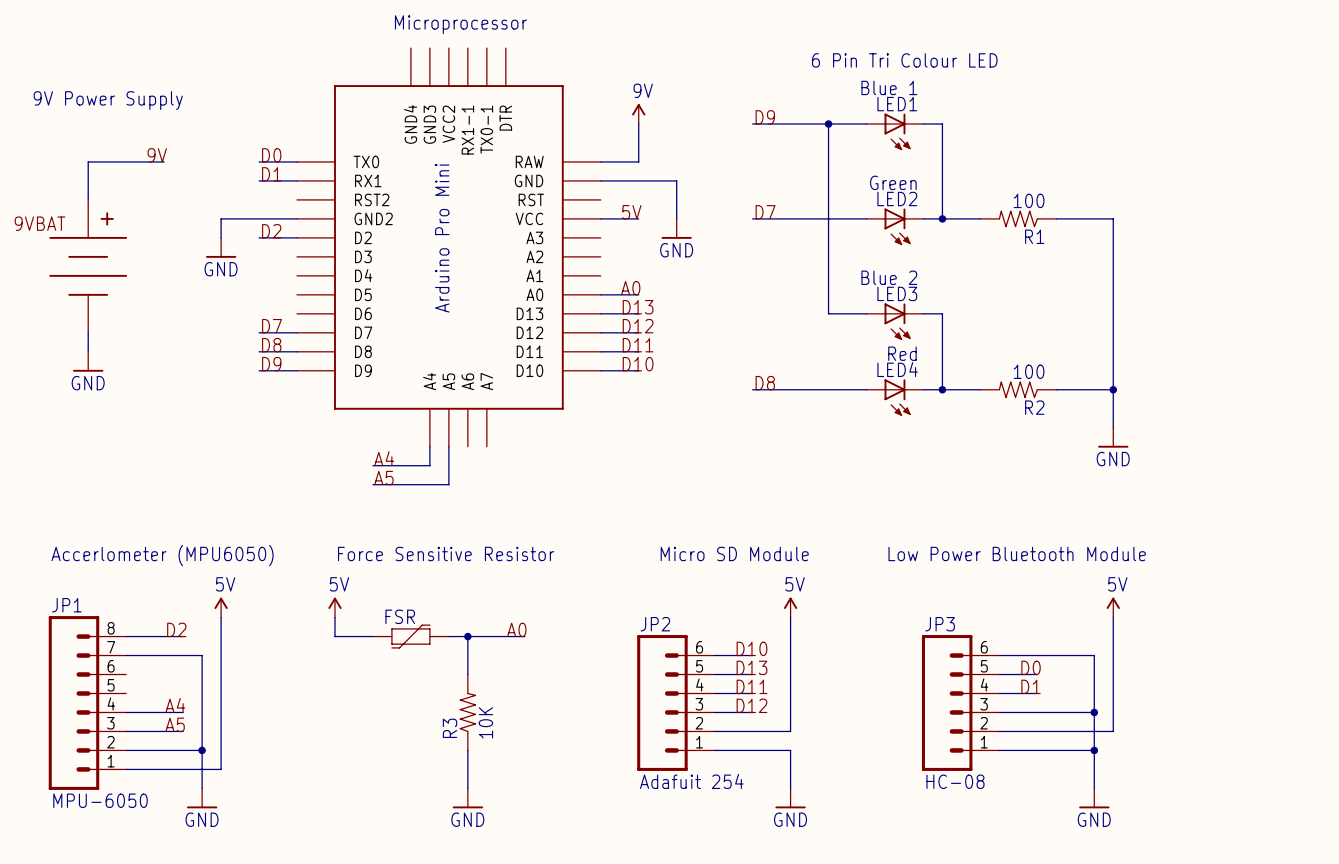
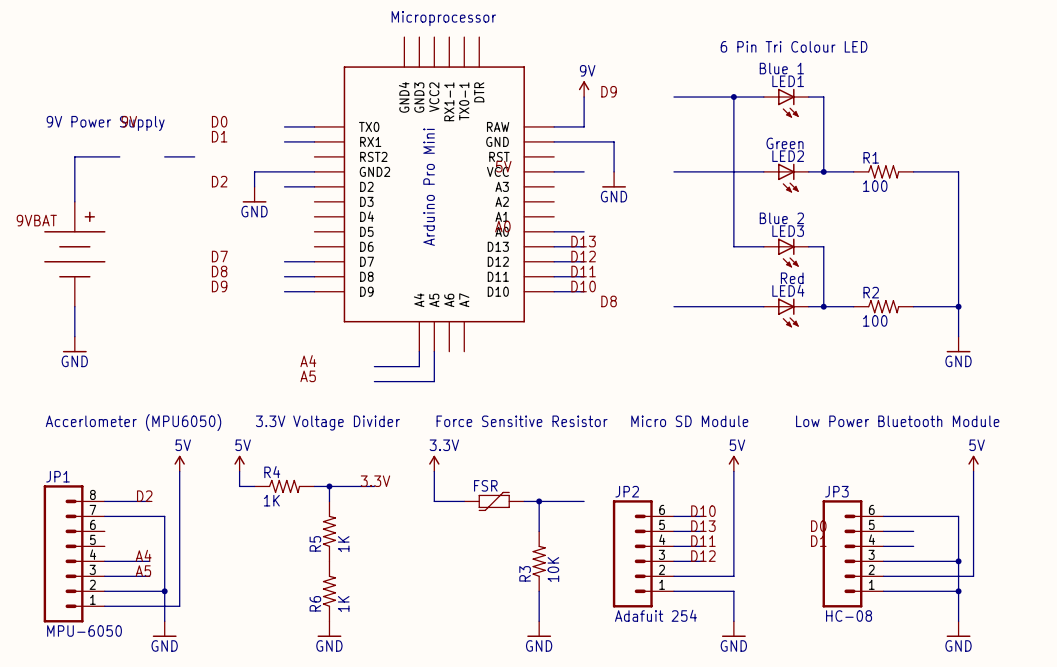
text position: Microprocessor (460, 24) -> Microprocessor (443, 18)
text position: 6 Pin Tri Colour LED (904, 60) -> 6 Pin Tri Colour LED (794, 46)
text position: 9V Power Supply (108, 100) -> 9V Power Supply (105, 123)
power symbol position: 9V (638, 114) -> 9V (584, 89)
wire: (638, 124) (638, 161) (600, 161) -> (584, 97) (584, 126) (554, 126)
wire: (752, 124) (847, 124) -> none
wire: (828, 124) (828, 313) (866, 313) -> none
junction: (828, 124) -> none
wire: none -> (688, 97) (733, 97) (733, 246)
junction: none -> (733, 97)
wire: (942, 124) (942, 218) -> (748, 97) (763, 97)
wire: none -> (808, 97) (823, 97) (823, 171)
LED1 position: (894, 131) -> (786, 103)
wire: (164, 161) (88, 161) (88, 199) -> none
wire: (259, 161) (297, 161) -> (284, 126) (314, 126)
wire: (259, 180) (297, 180) -> (284, 141) (314, 141)
wire: (600, 180) (676, 180) (676, 218) -> (554, 141) (614, 141) (614, 171)
wire: none -> (119, 156) (74, 156) (74, 201)
wire: none -> (164, 156) (194, 156)
label: D7 (765, 212) -> none
wire: (297, 218) (221, 218) (221, 237) -> (314, 171) (254, 171) (254, 186)
wire: (600, 218) (638, 218) -> (554, 171) (584, 171)
wire: (752, 218) (847, 218) -> none
junction: (942, 218) -> none
R1 rotation: 0° (1018, 218) -> 180° (883, 171)
R1 position: (1018, 218) -> (883, 171)
junction: none -> (823, 171)
wire: (1075, 218) (1113, 218) (1113, 427) -> none
wire: none -> (913, 171) (958, 171) (958, 336)
LED2 position: (894, 226) -> (786, 178)
power symbol position: GND (676, 228) -> GND (614, 179)
wire: (259, 237) (297, 237) -> (284, 186) (314, 186)
power symbol position: GND (221, 247) -> GND (254, 194)
part position: (448, 247) -> (434, 194)
9VBAT position: (88, 266) -> (74, 254)
wire: (600, 294) (638, 294) -> (554, 231) (584, 231)
label position: D13 (638, 307) -> D13 (583, 241)
wire: (600, 313) (638, 313) -> (554, 246) (584, 246)
wire: (942, 313) (942, 389) -> (748, 246) (763, 246)
wire: none -> (808, 246) (823, 246) (823, 306)
LED3 position: (894, 321) -> (786, 253)
label position: D12 (638, 326) -> D12 (583, 256)
wire: (88, 332) (88, 351) -> none
wire: (259, 332) (297, 332) -> (284, 261) (314, 261)
wire: (600, 332) (638, 332) -> (554, 261) (584, 261)
label position: D11 (638, 345) -> D11 (583, 271)
wire: (259, 351) (297, 351) -> (284, 276) (314, 276)
wire: (600, 351) (638, 351) -> (554, 276) (584, 276)
power symbol position: GND (88, 361) -> GND (74, 344)
label position: D10 (638, 364) -> D10 (583, 286)
wire: (259, 370) (297, 370) -> (284, 291) (314, 291)
wire: (600, 370) (638, 370) -> (554, 291) (584, 291)
wire: none -> (74, 306) (74, 336)
wire: (752, 389) (847, 389) -> none
junction: (942, 389) -> none
R2 rotation: 0° (1018, 389) -> 180° (883, 306)
R2 position: (1018, 389) -> (883, 306)
junction: none -> (823, 306)
junction: (1113, 389) -> none
wire: none -> (913, 306) (958, 306)
junction: none -> (958, 306)
LED4 position: (894, 397) -> (786, 312)
power symbol position: GND (1113, 437) -> GND (958, 344)
wire: (429, 446) (429, 465) (372, 465) -> (419, 351) (419, 366) (374, 366)
wire: (448, 446) (448, 484) (372, 484) -> (434, 351) (434, 381) (374, 381)
text: none -> Force Sensitive Resistor (522, 421)
text: none -> 3.3V Voltage Divider (327, 423)
text: Force Sensitive Resistor (446, 553) -> none
text position: Micro SD Module (734, 553) -> Micro SD Module (689, 421)
text position: Low Power Bluetooth Module (1017, 553) -> Low Power Bluetooth Module (897, 421)
text position: Accerlometer (MPU6050) (162, 555) -> Accerlometer (MPU6050) (133, 422)
power symbol: none -> 5V (239, 463)
power symbol: none -> 3.3V (434, 463)
power symbol: none -> 5V (733, 463)
power symbol: none -> 5V (973, 463)
wire: none -> (239, 471) (239, 486) (254, 486)
wire: none -> (434, 471) (434, 501) (464, 501)
wire: none -> (733, 471) (733, 576) (673, 576)
wire: none -> (973, 471) (973, 576) (883, 576)
power symbol position: 5V (221, 607) -> 5V (179, 463)
power symbol: 5V (334, 607) -> none
power symbol: 5V (790, 607) -> none
power symbol: 5V (1113, 607) -> none
label: none -> 3.3V (375, 481)
wire: (334, 617) (334, 636) (372, 636) -> none
R4: none -> 1K (284, 486)
wire: none -> (329, 486) (329, 501)
junction: none -> (329, 486)
wire: (790, 617) (790, 731) (714, 731) -> none
wire: (1113, 617) (1113, 731) (999, 731) -> none
label: A0 (516, 629) -> none
FSR: (410, 636) -> none
wire: (448, 636) (524, 636) -> (314, 486) (374, 486)
wire: (467, 636) (467, 674) -> none
junction: (467, 636) -> none
FSR: none -> (494, 501)
wire: none -> (524, 501) (584, 501)
wire: none -> (539, 501) (539, 531)
junction: none -> (539, 501)
label position: D10 (751, 648) -> D10 (703, 511)
wire: (714, 655) (752, 655) -> (673, 516) (703, 516)
wire: (999, 655) (1094, 655) (1094, 788) -> (883, 516) (958, 516) (958, 621)
label position: D13 (751, 667) -> D13 (703, 526)
R5: none -> 1K (329, 531)
wire: (714, 674) (752, 674) -> (673, 531) (703, 531)
wire: (999, 674) (1037, 674) -> (883, 531) (913, 531)
label position: D11 (751, 686) -> D11 (703, 541)
wire: (714, 693) (752, 693) -> (673, 546) (703, 546)
wire: (999, 693) (1037, 693) -> (883, 546) (913, 546)
JP2 position: (675, 702) -> (643, 553)
JP3 position: (960, 702) -> (853, 553)
label position: D12 (751, 705) -> D12 (703, 556)
R3 position: (467, 712) -> (539, 561)
wire: (714, 712) (752, 712) -> (673, 561) (703, 561)
wire: (999, 712) (1094, 712) -> (883, 561) (958, 561)
junction: (1094, 712) -> none
junction: none -> (958, 561)
R6: none -> 1K (329, 591)
wire: (467, 750) (467, 788) -> none
wire: none -> (539, 591) (539, 621)
wire: (714, 750) (790, 750) (790, 788) -> (673, 591) (733, 591) (733, 621)
wire: (999, 750) (1094, 750) -> (883, 591) (958, 591)
junction: (1094, 750) -> none
junction: none -> (958, 591)
power symbol position: GND (467, 798) -> GND (329, 629)
power symbol: none -> GND (539, 629)
power symbol: GND (790, 798) -> none
power symbol: none -> GND (733, 629)
power symbol: GND (1094, 798) -> none
power symbol: none -> GND (958, 629)

